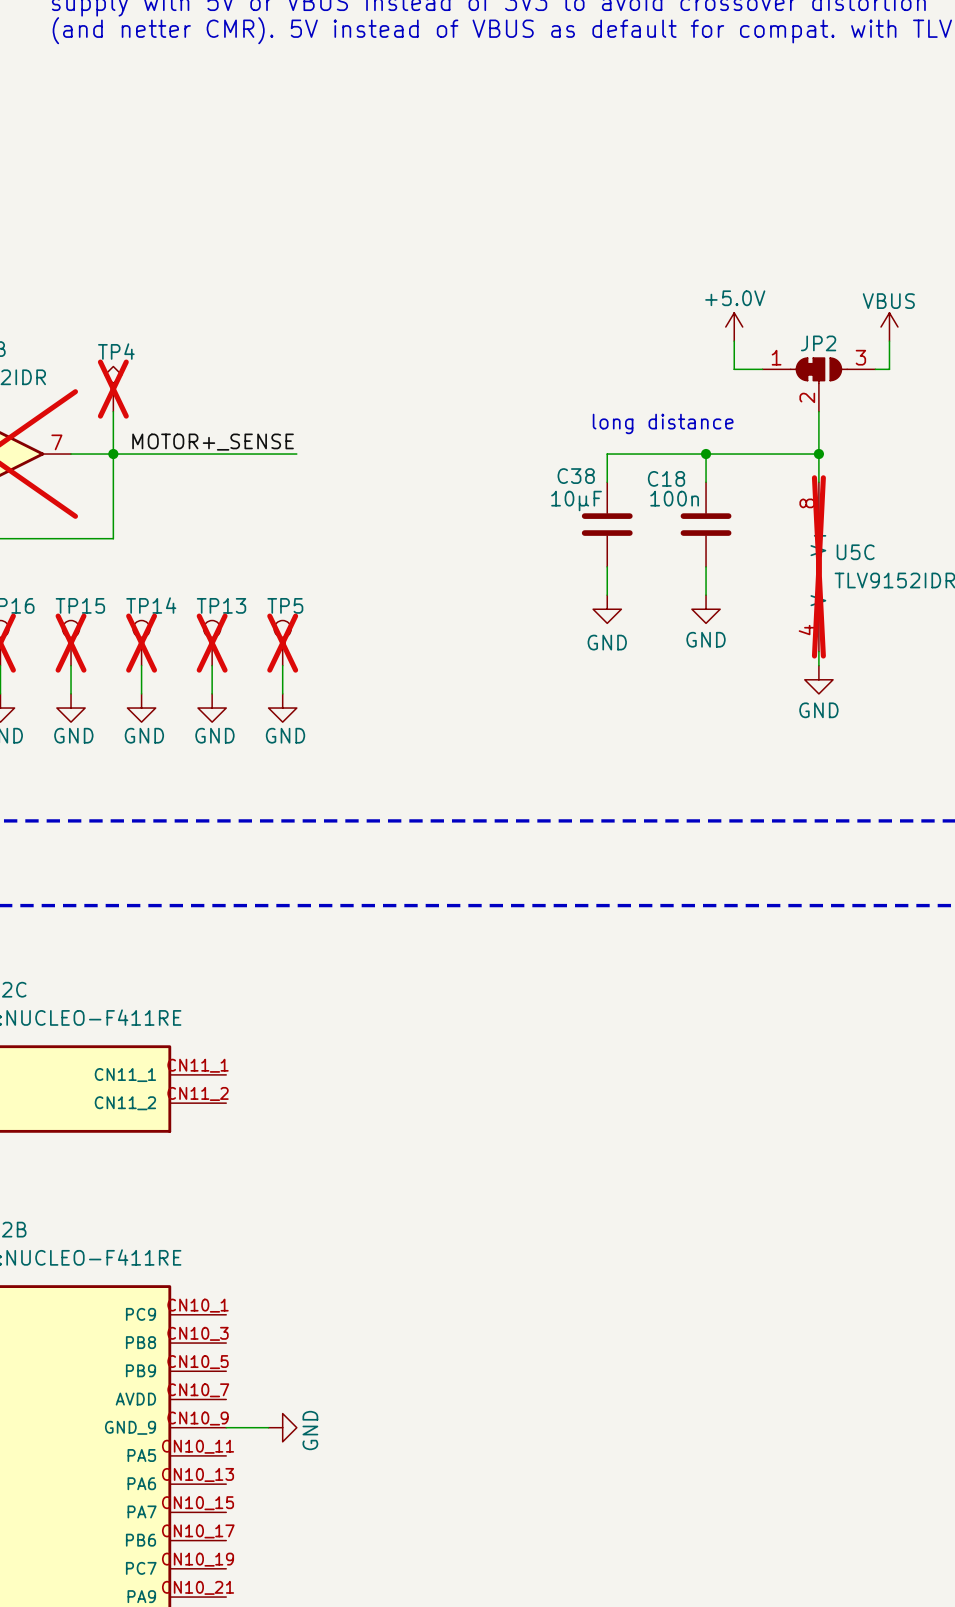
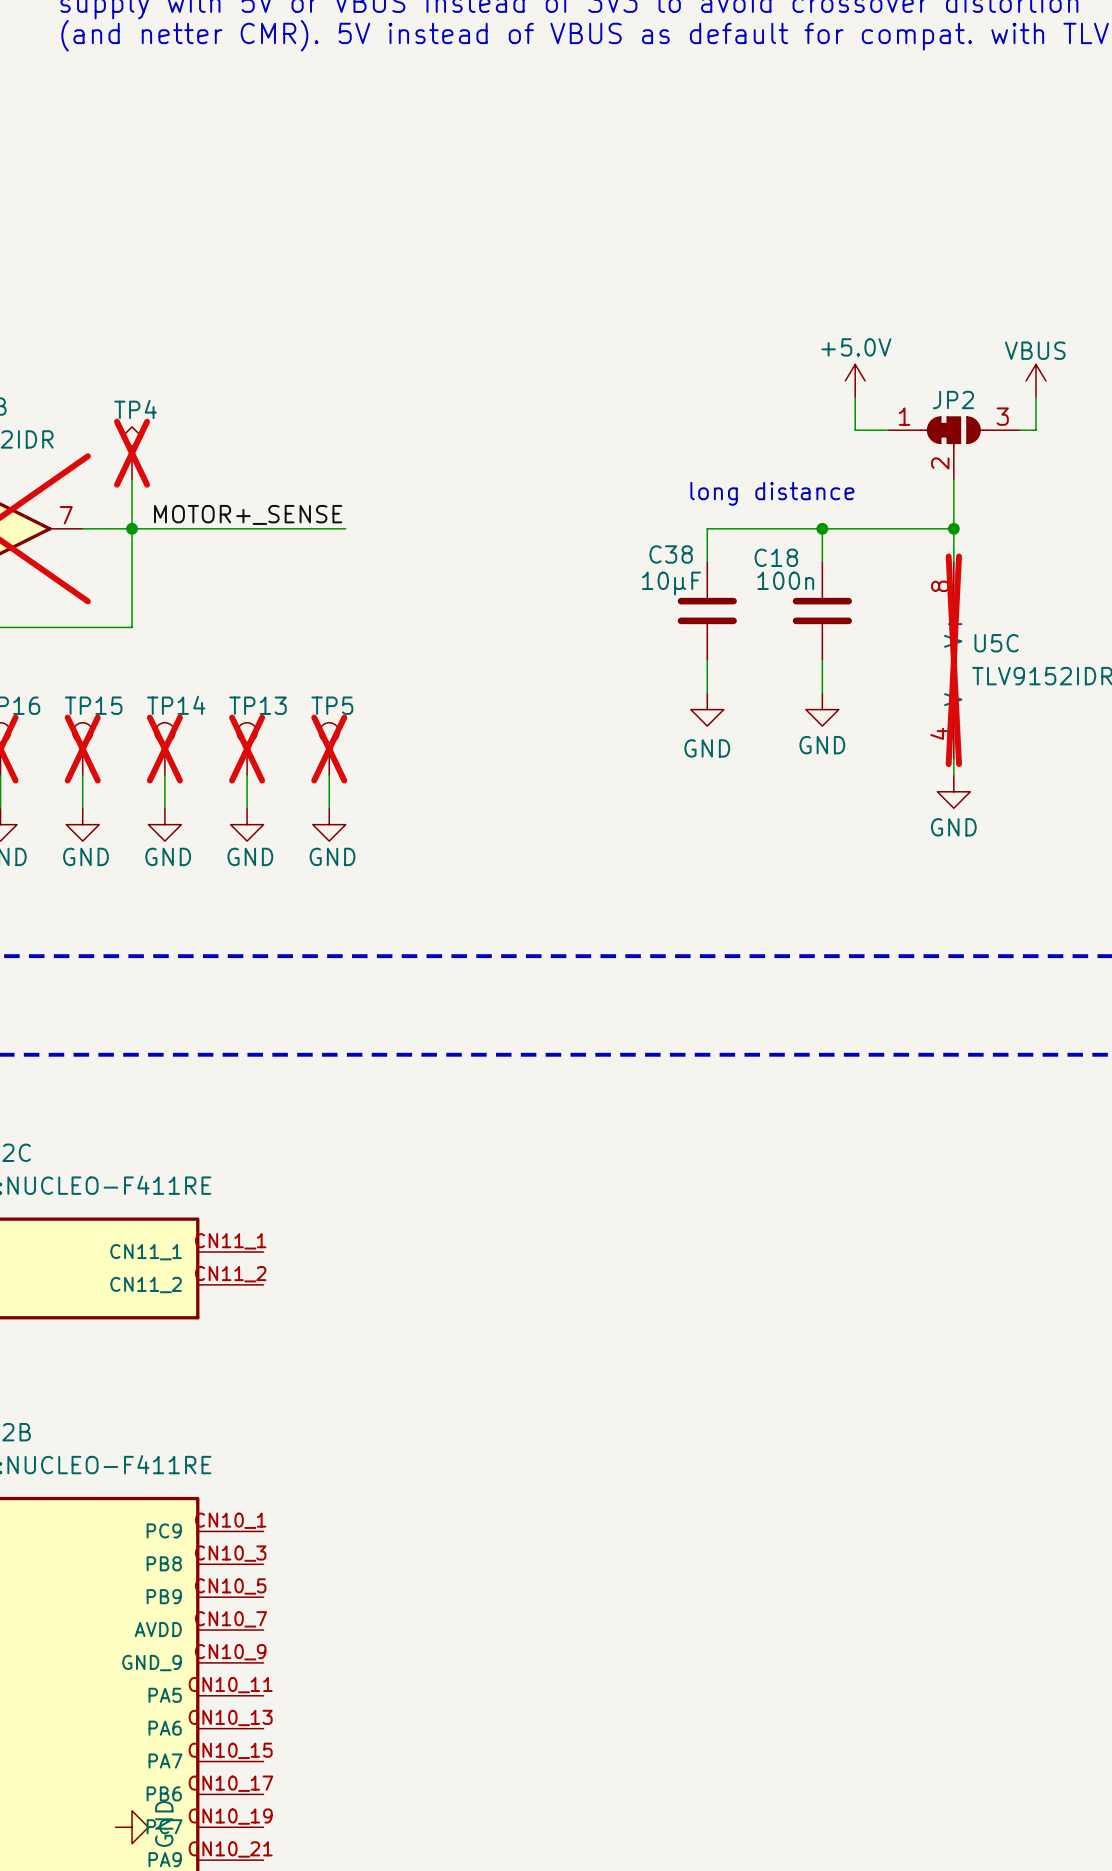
wire: (226, 1427) (268, 1427) -> none
power symbol: GND (282, 1427) -> none
power symbol: none -> GND (132, 1827)

